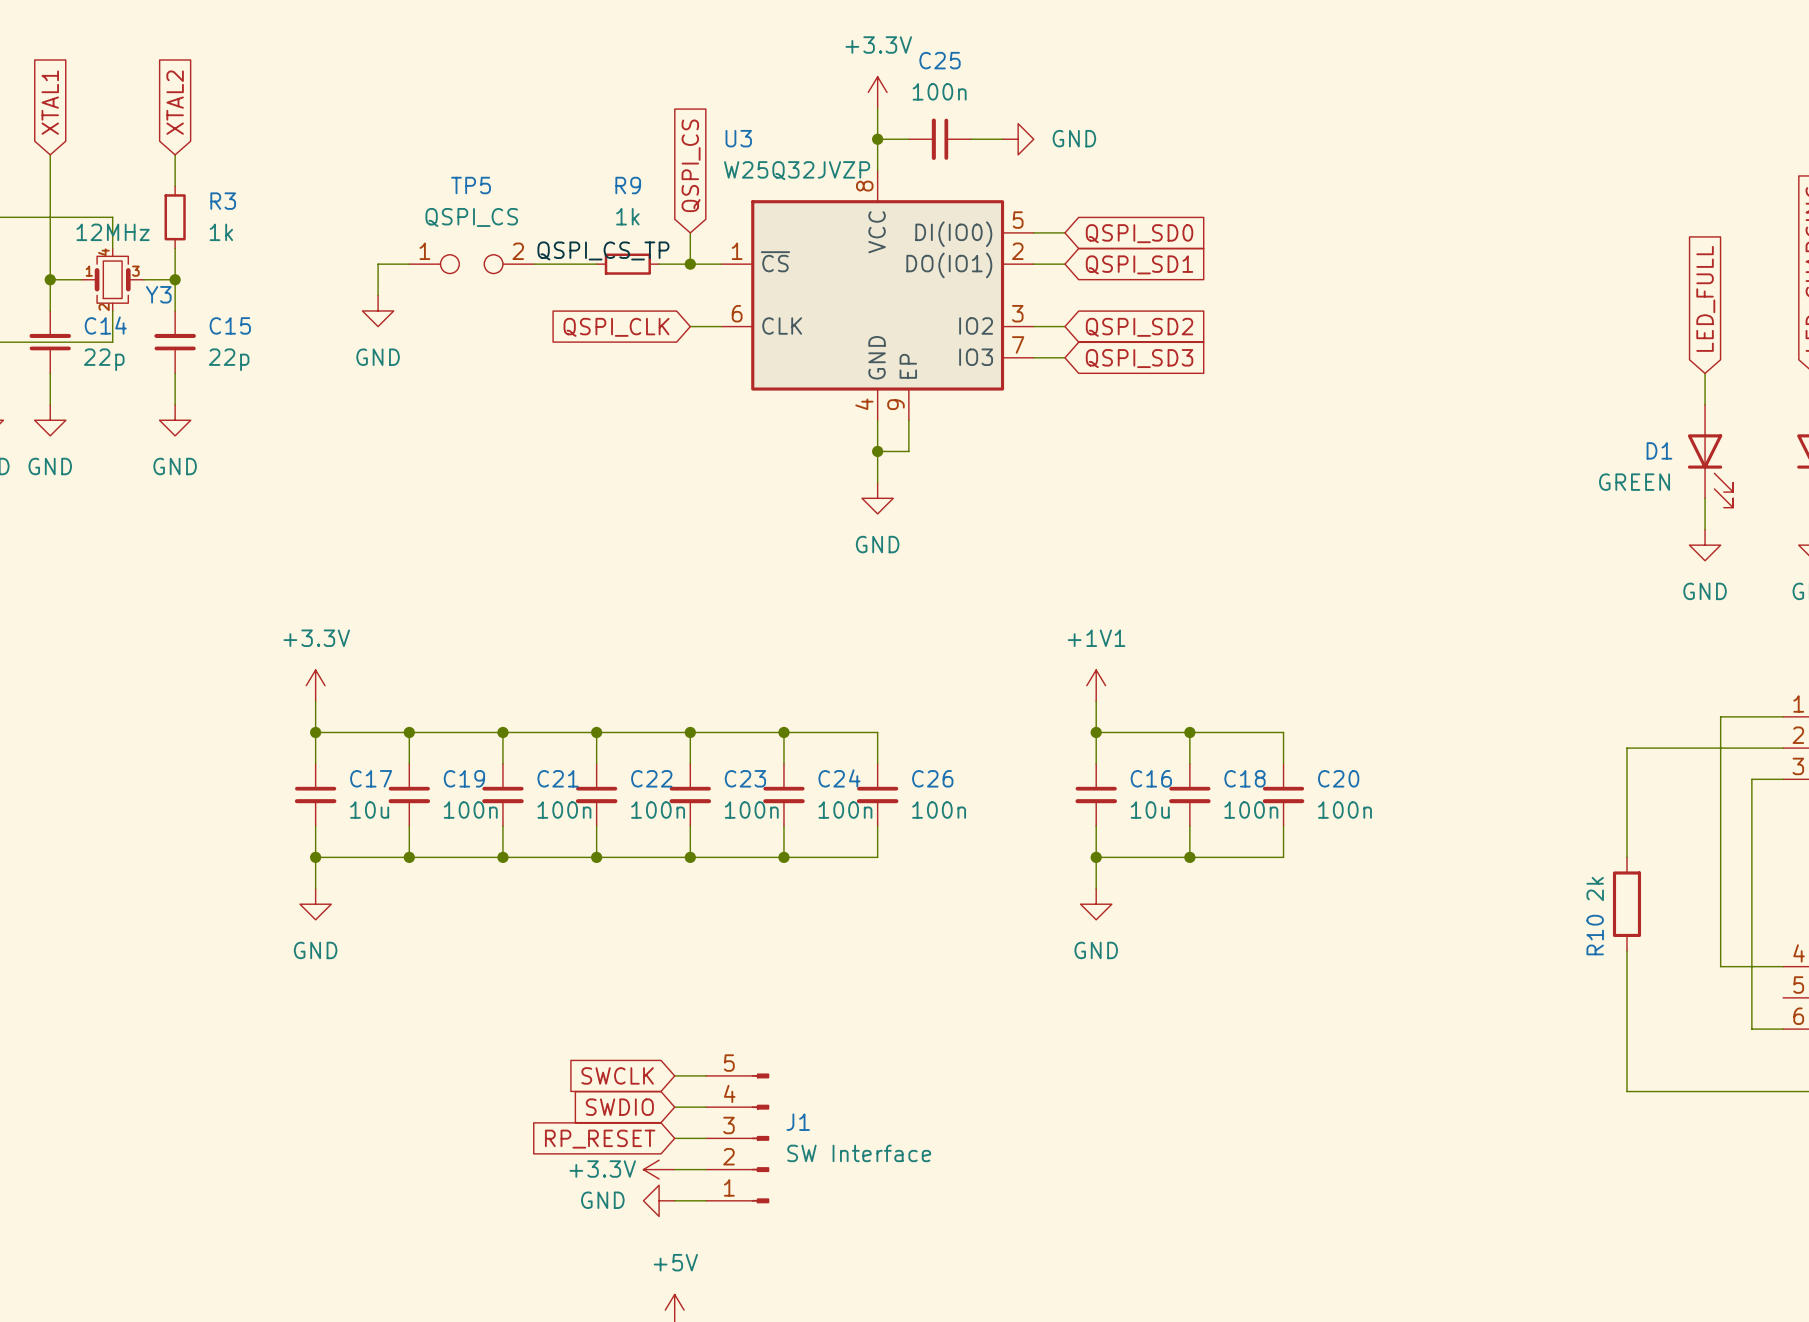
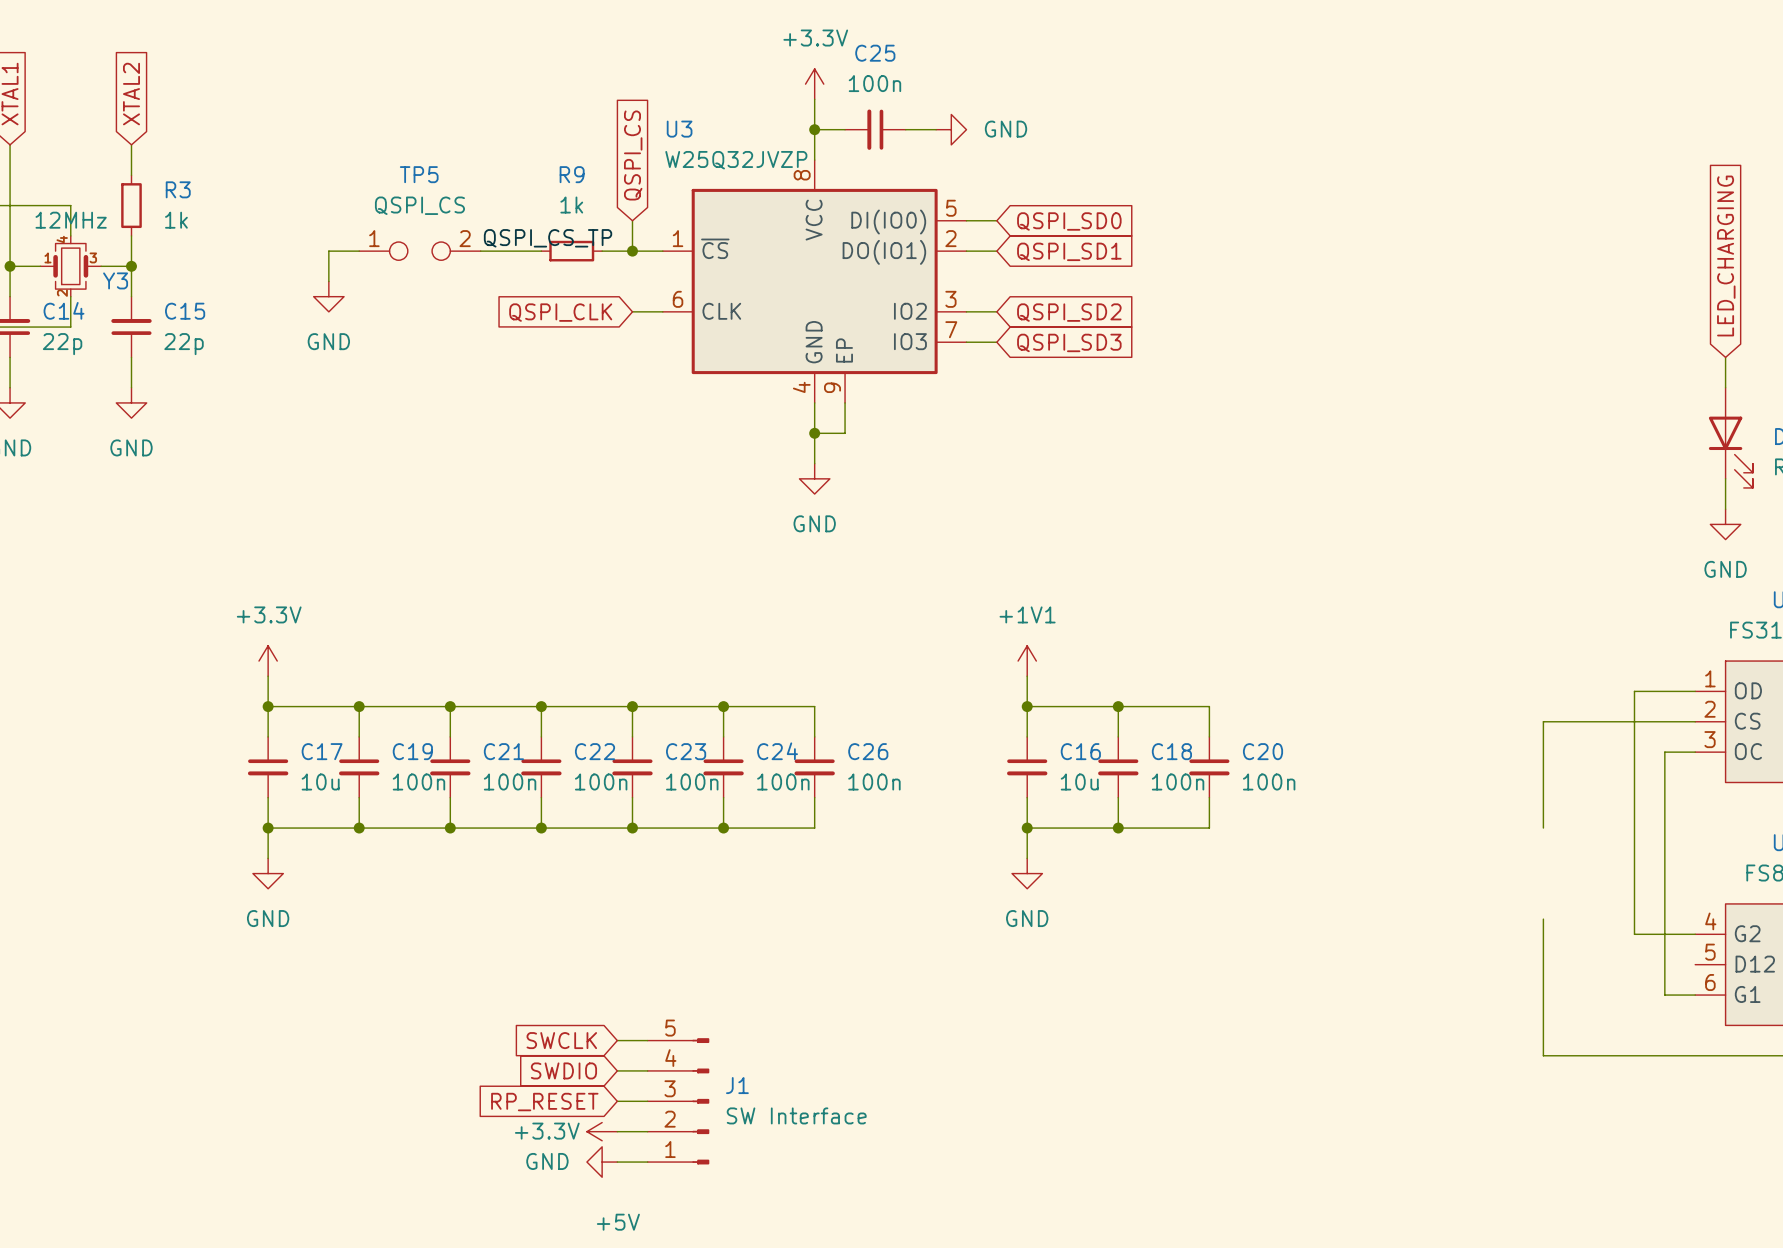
global label: LED_FULL (1705, 298) -> none
wire: (1705, 373) (1705, 404) -> none
D1: GREEN (1710, 456) -> none
wire: (1705, 498) (1705, 529) -> none
power symbol: GND (1705, 545) -> none
R10: 2k (1626, 904) -> none

